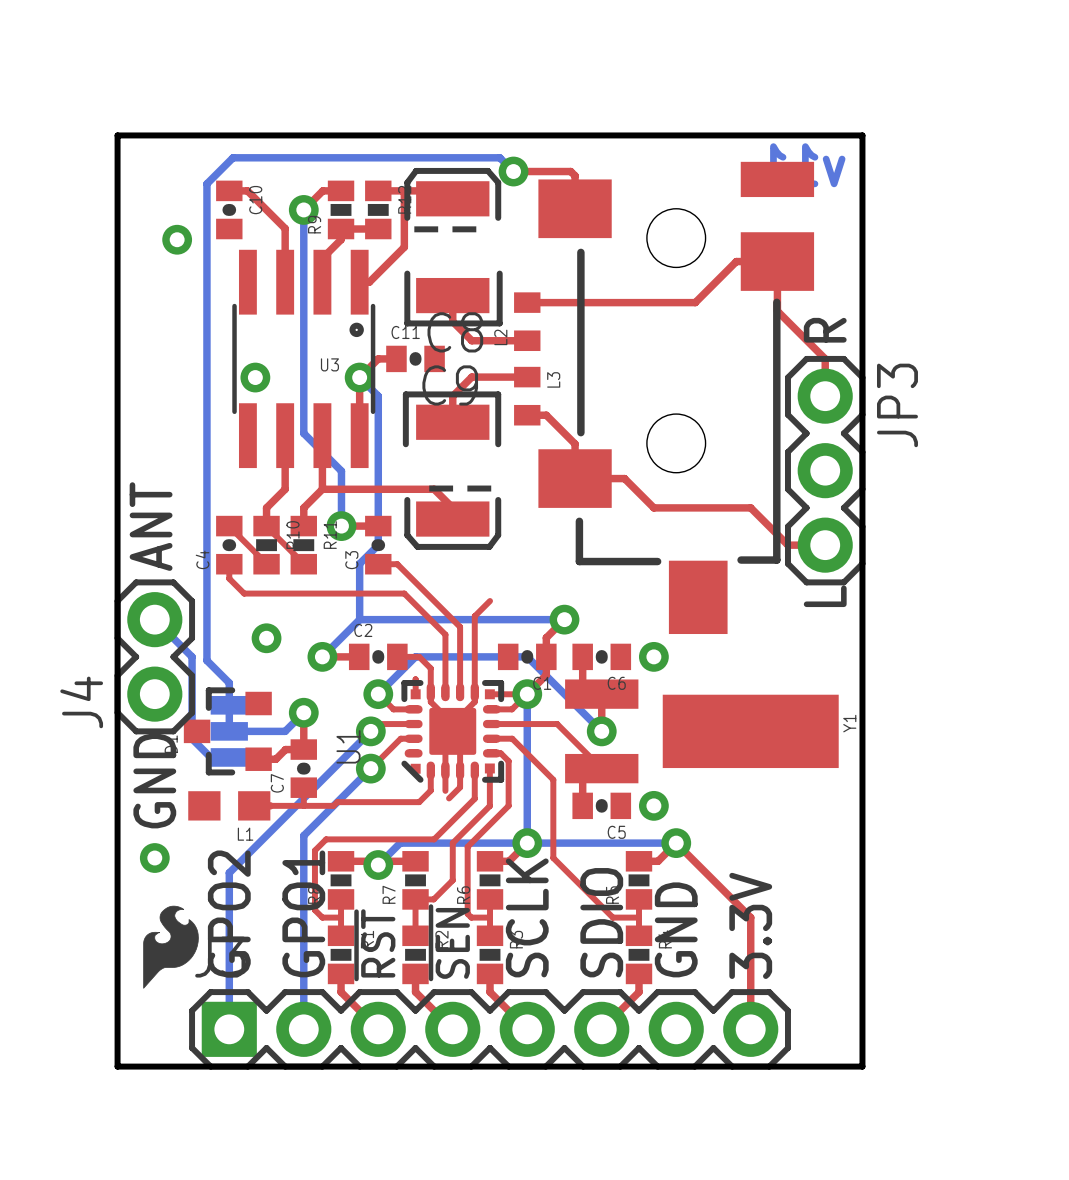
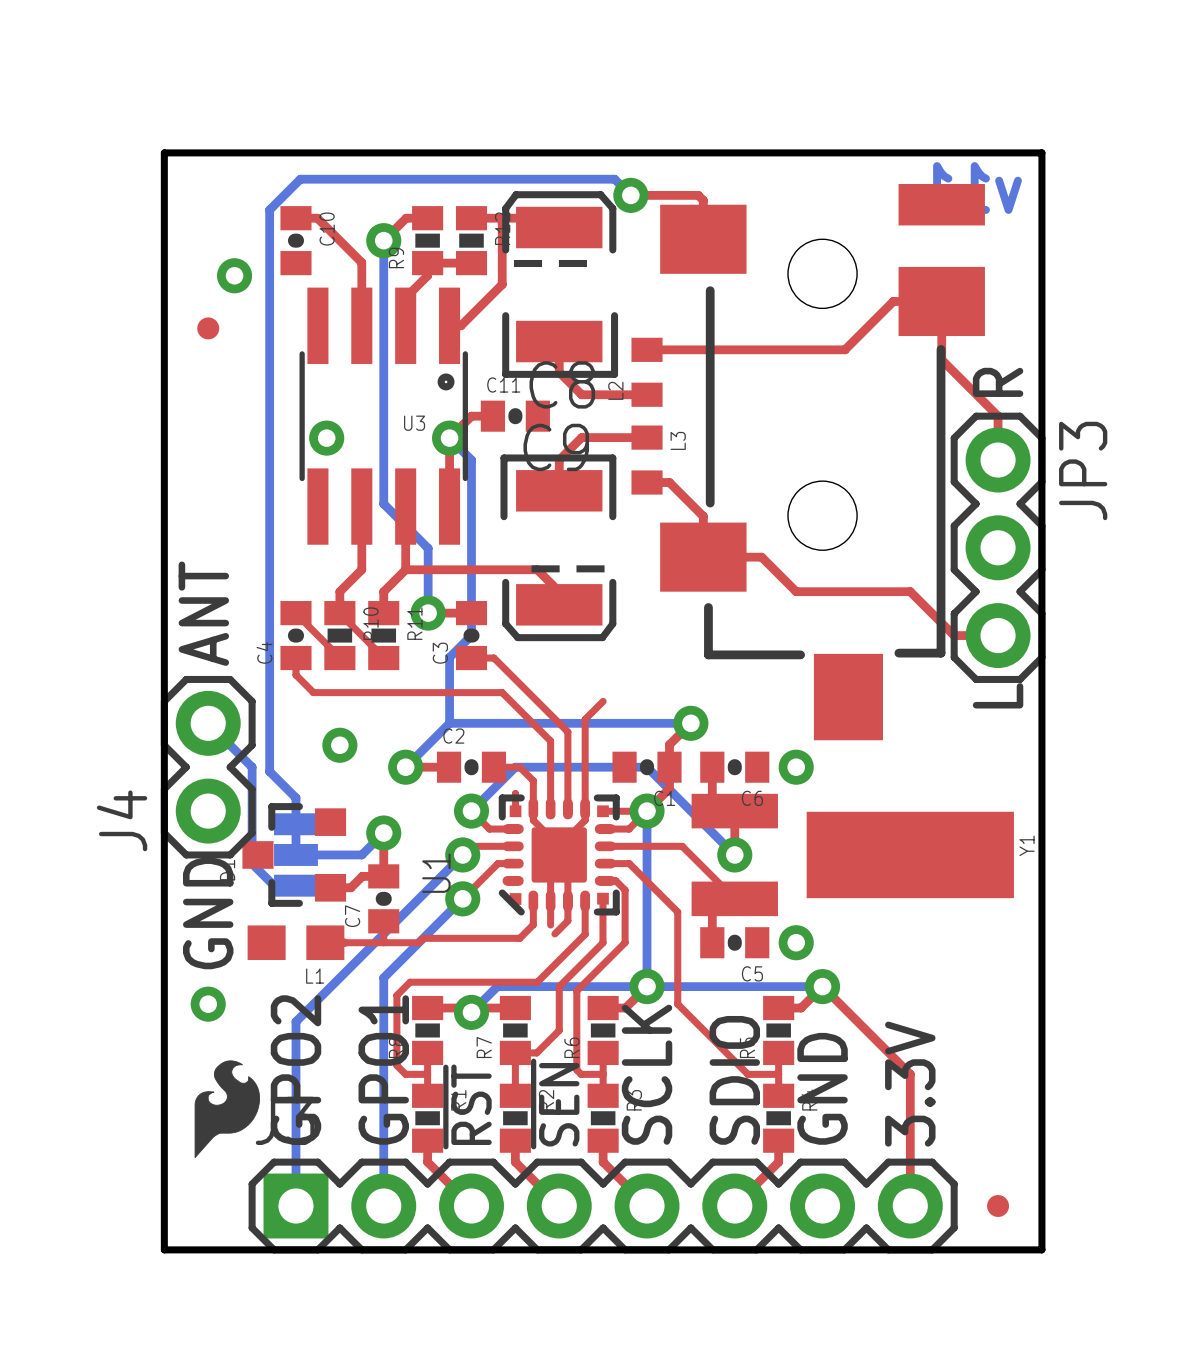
part: none -> (208, 328)
part: none -> (998, 1206)

